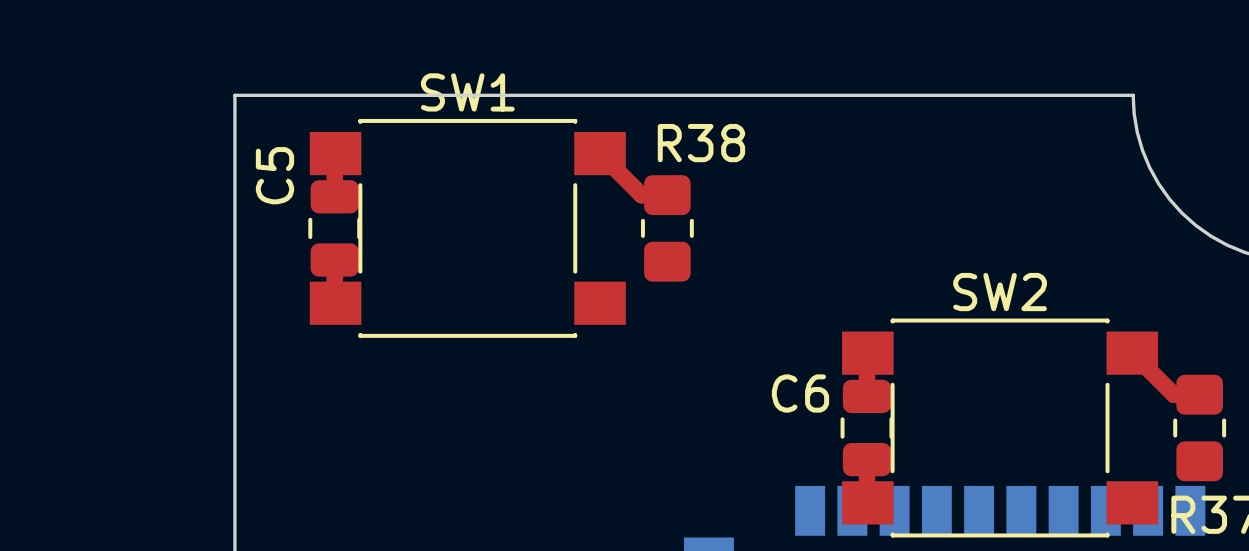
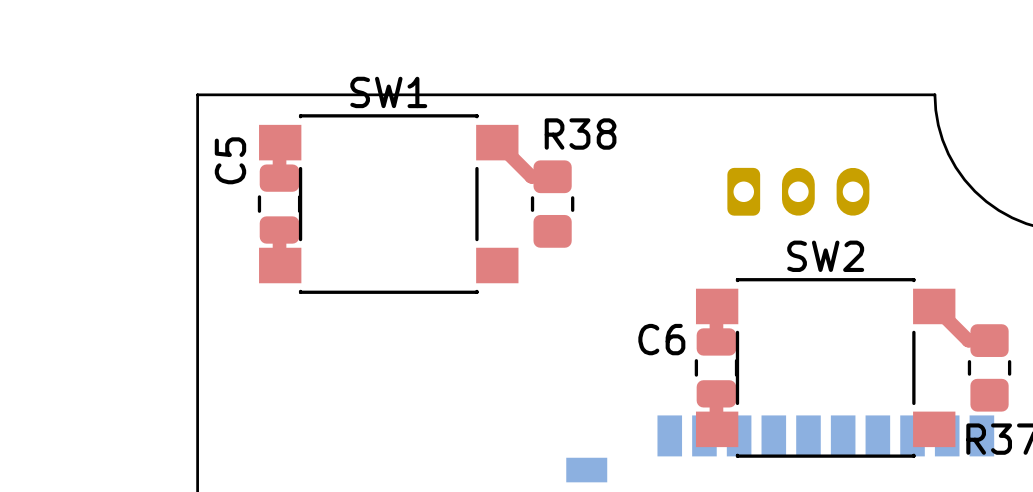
part: none -> (798, 191)

